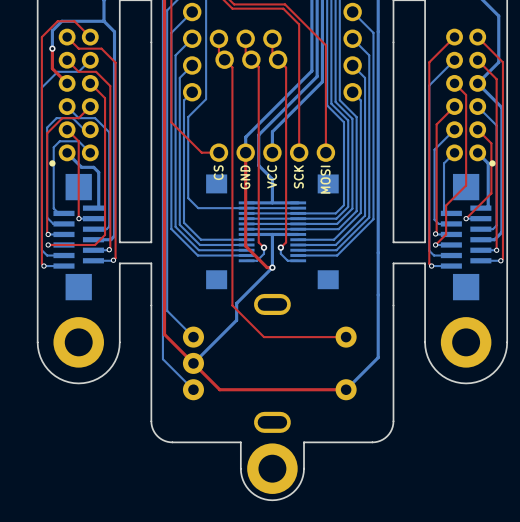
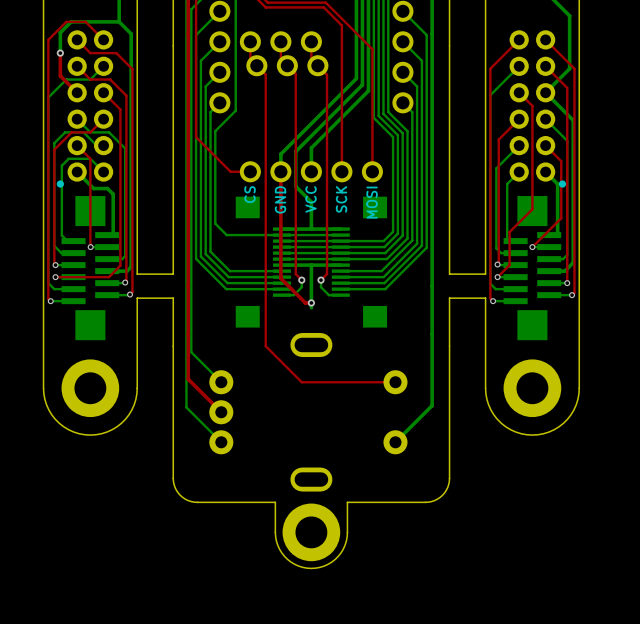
bottom track: (272, 267) (236, 303) (236, 320) (193, 363) -> (311, 302) (311, 307)
top track: (193, 363) (219, 389) (346, 389) -> none

